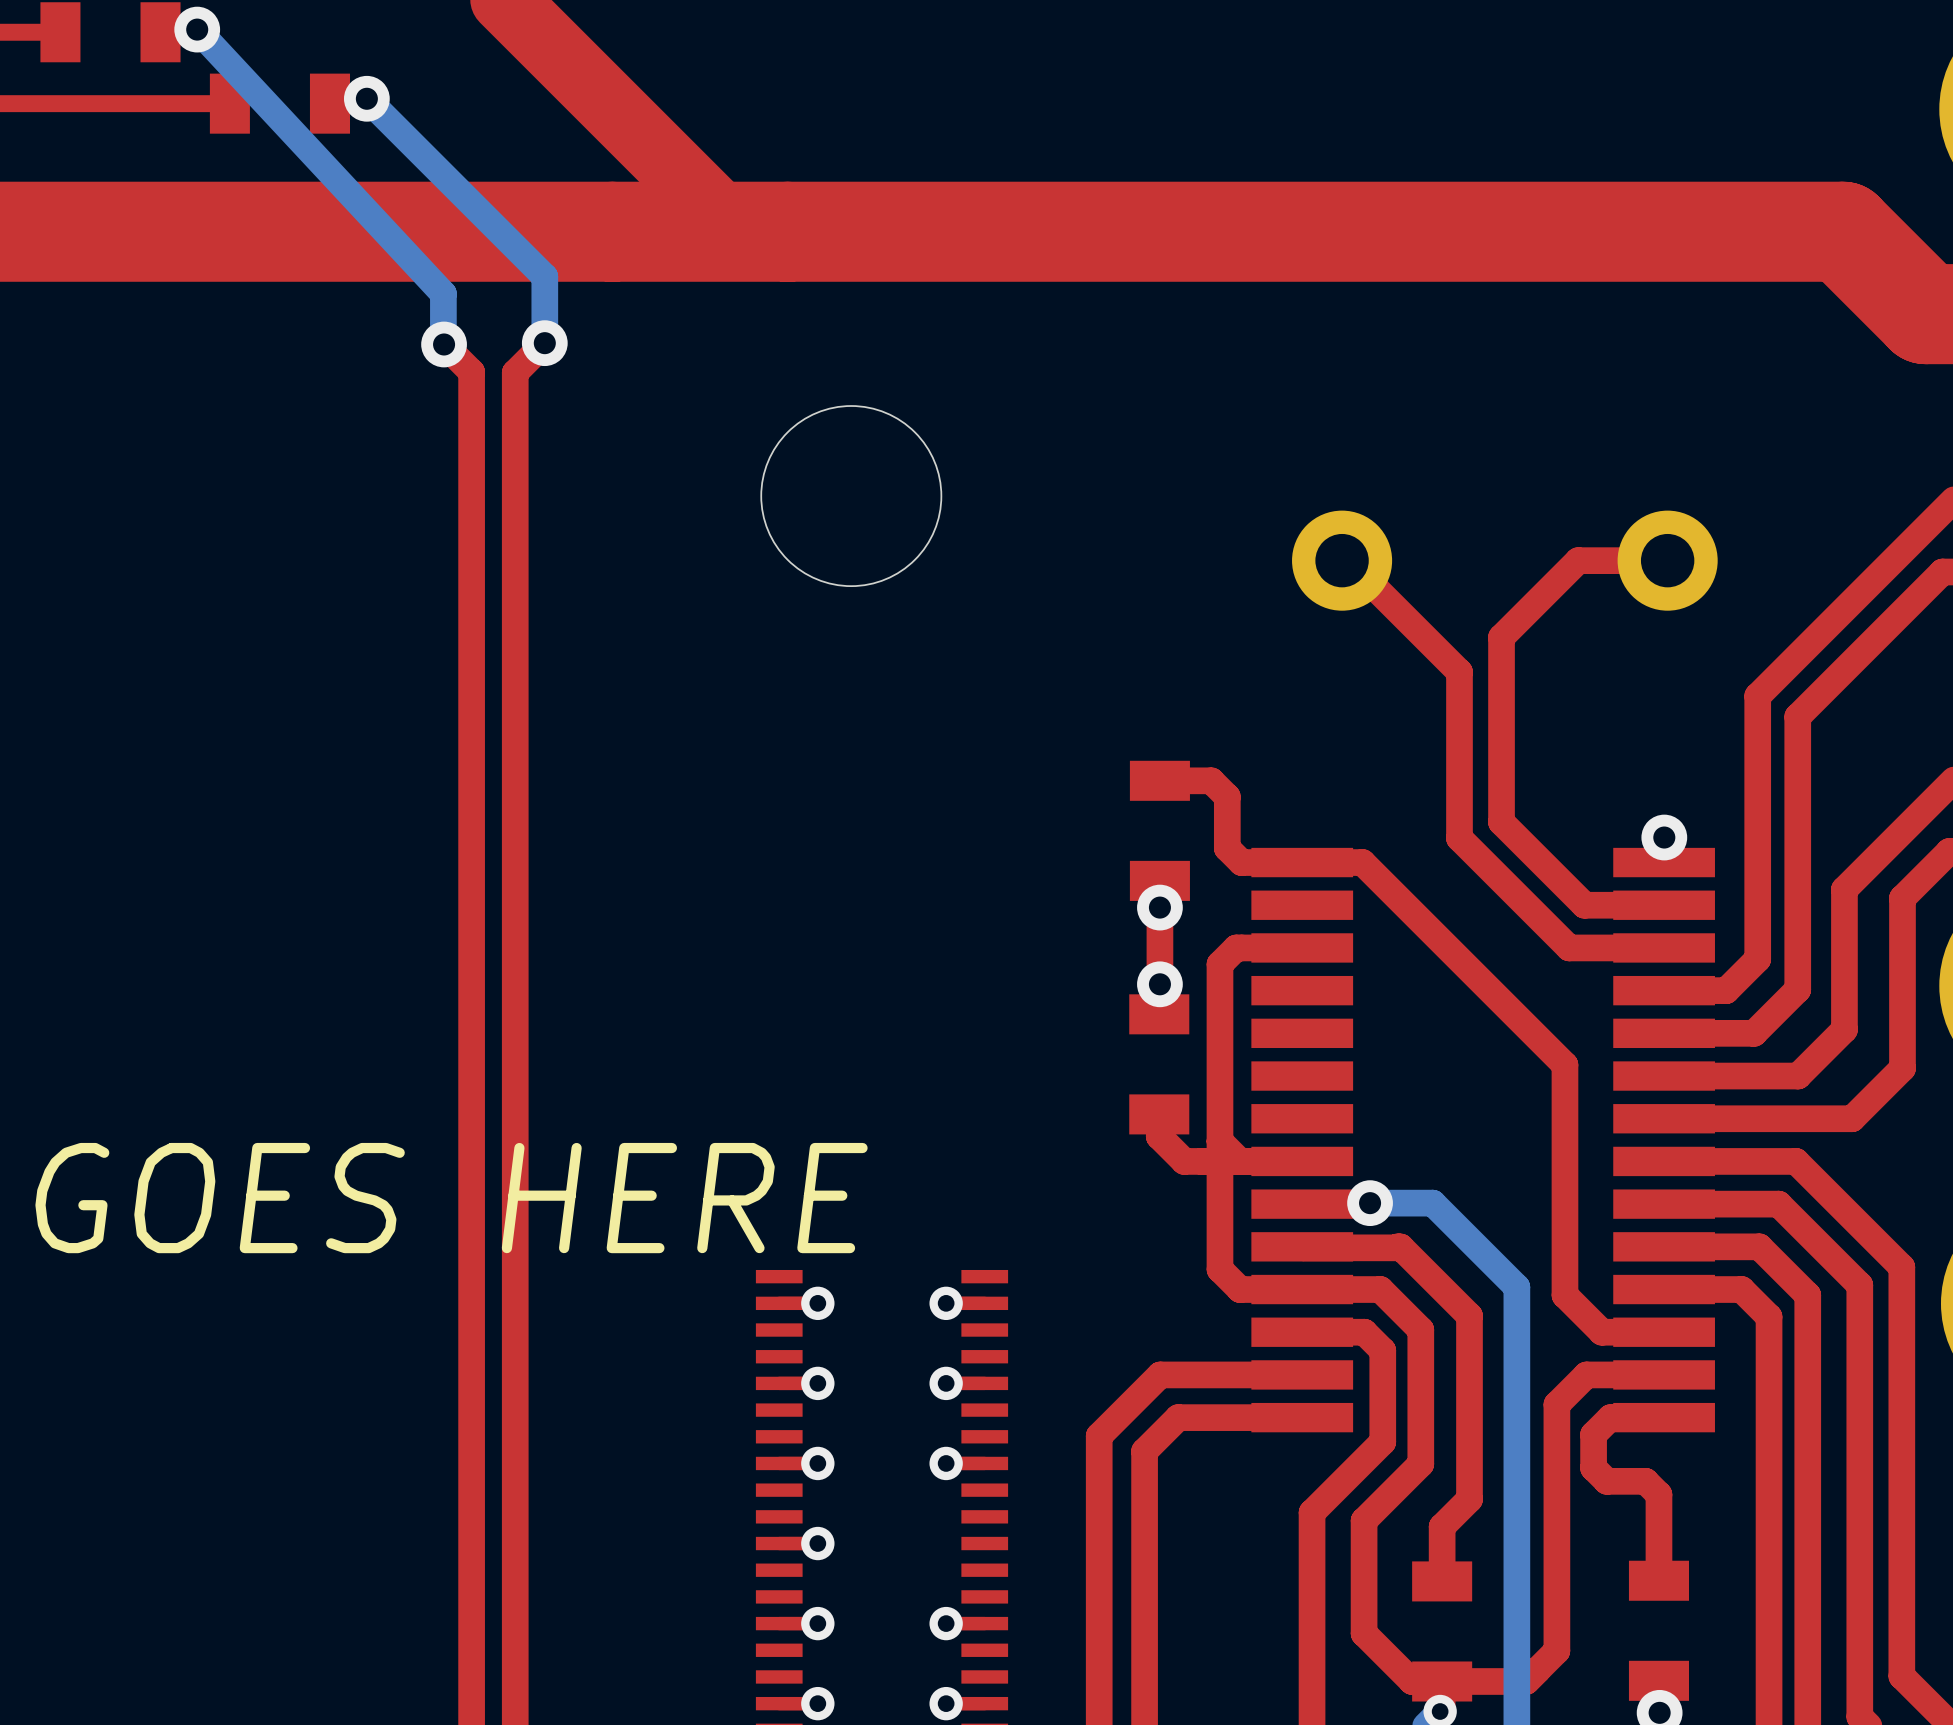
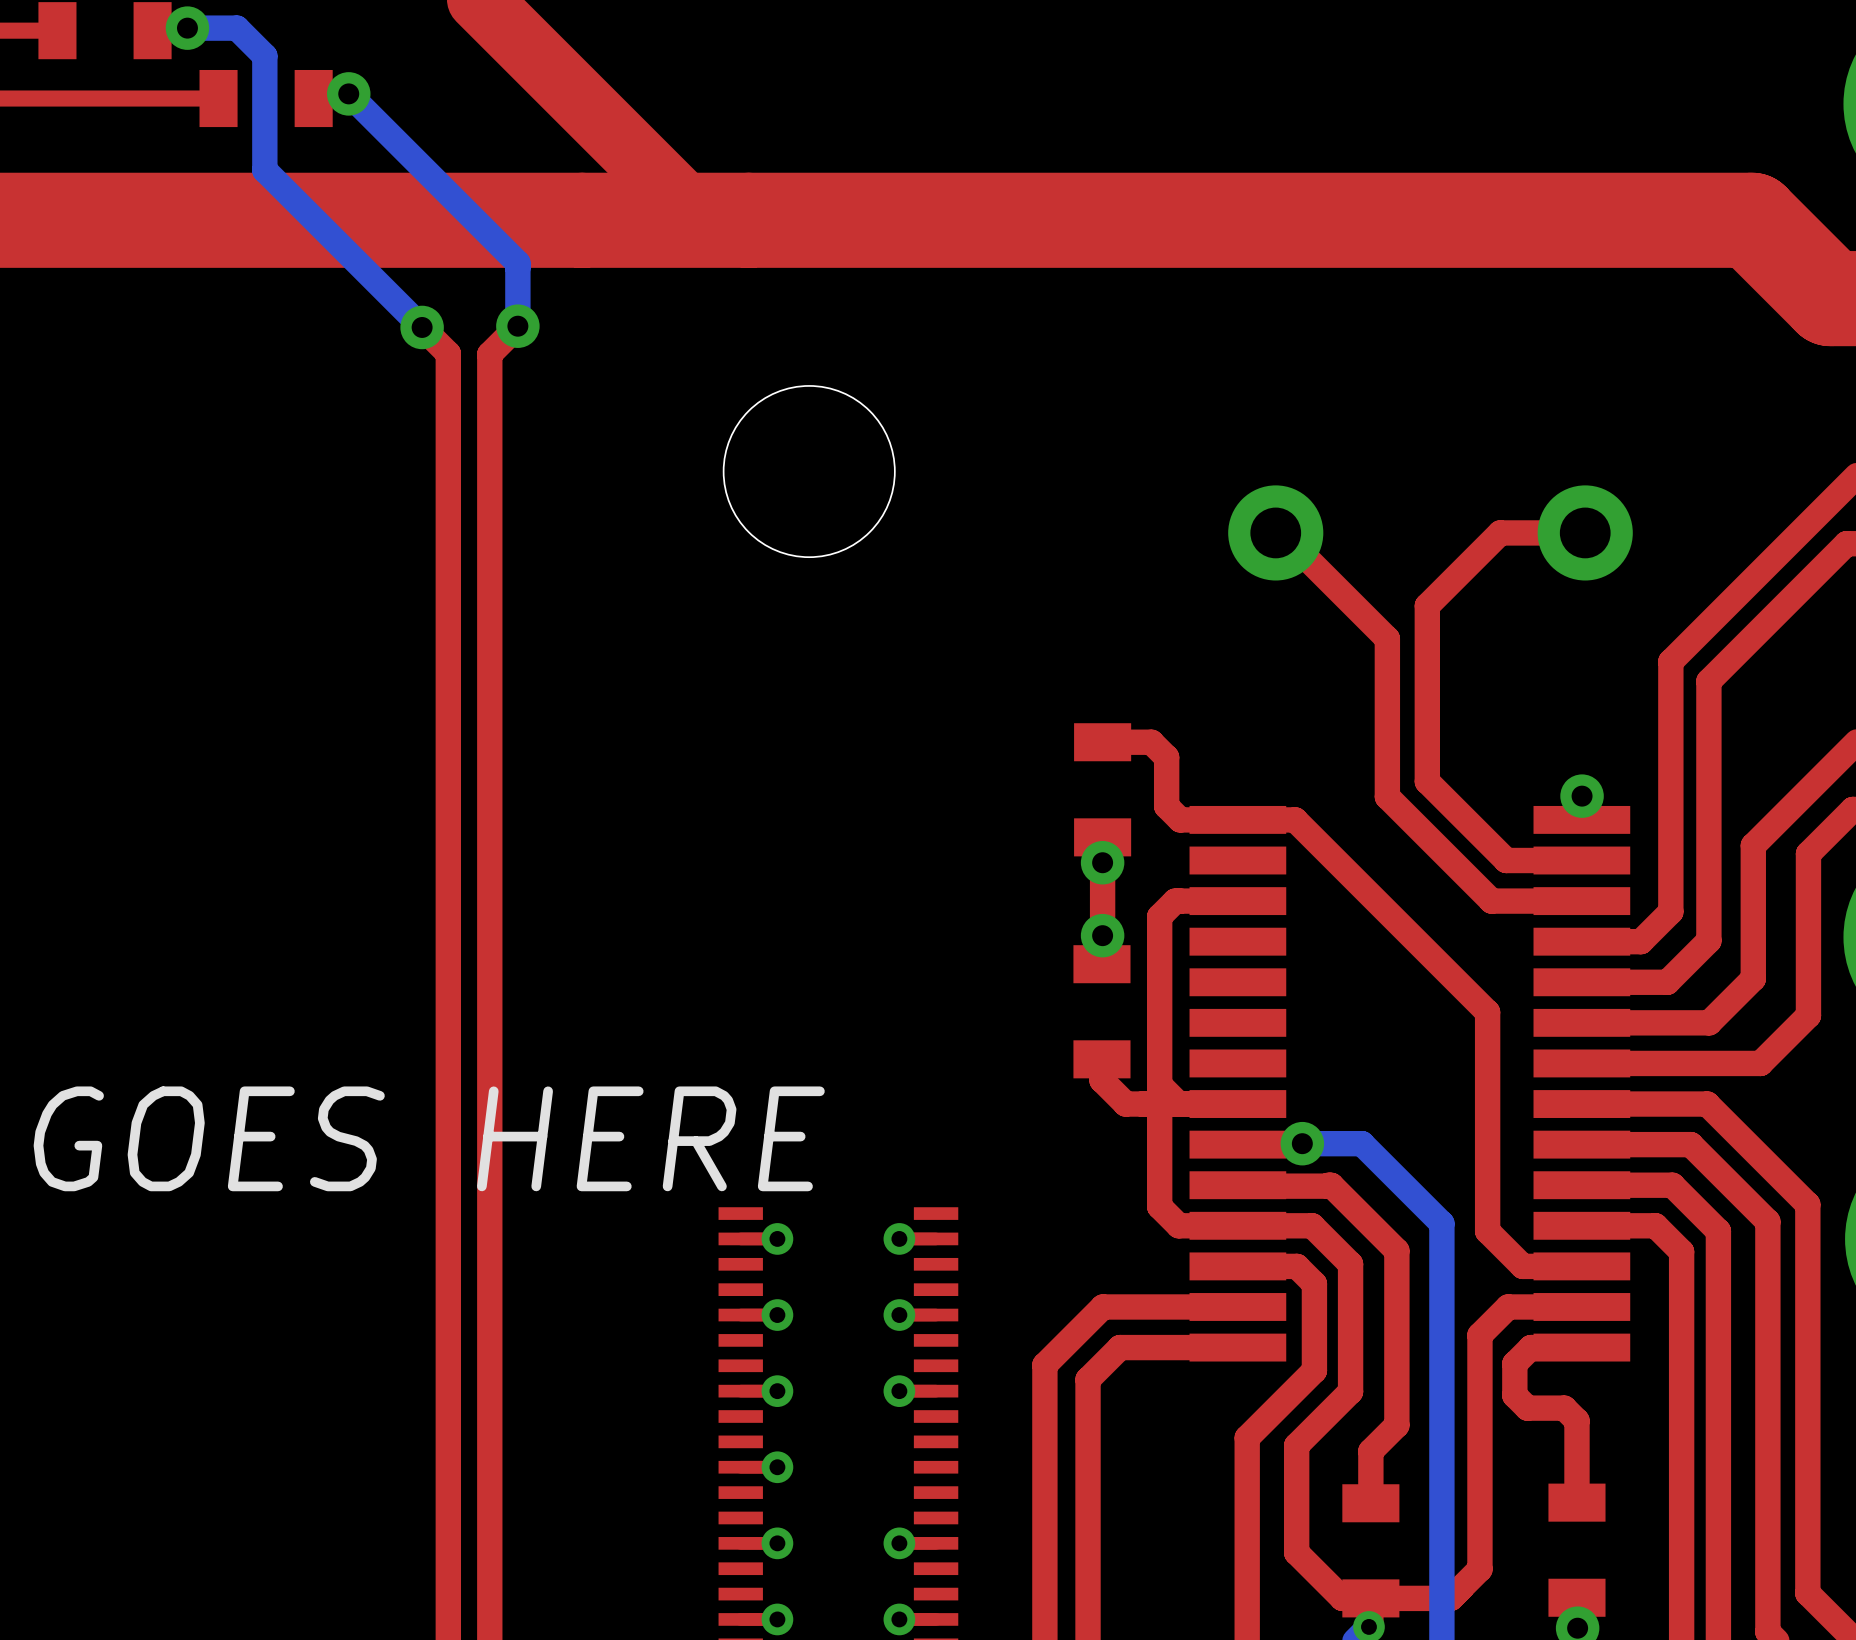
bottom track: (197, 29) (443, 293) (443, 343) -> (187, 28) (236, 28) (264, 56) (264, 170) (421, 326)

